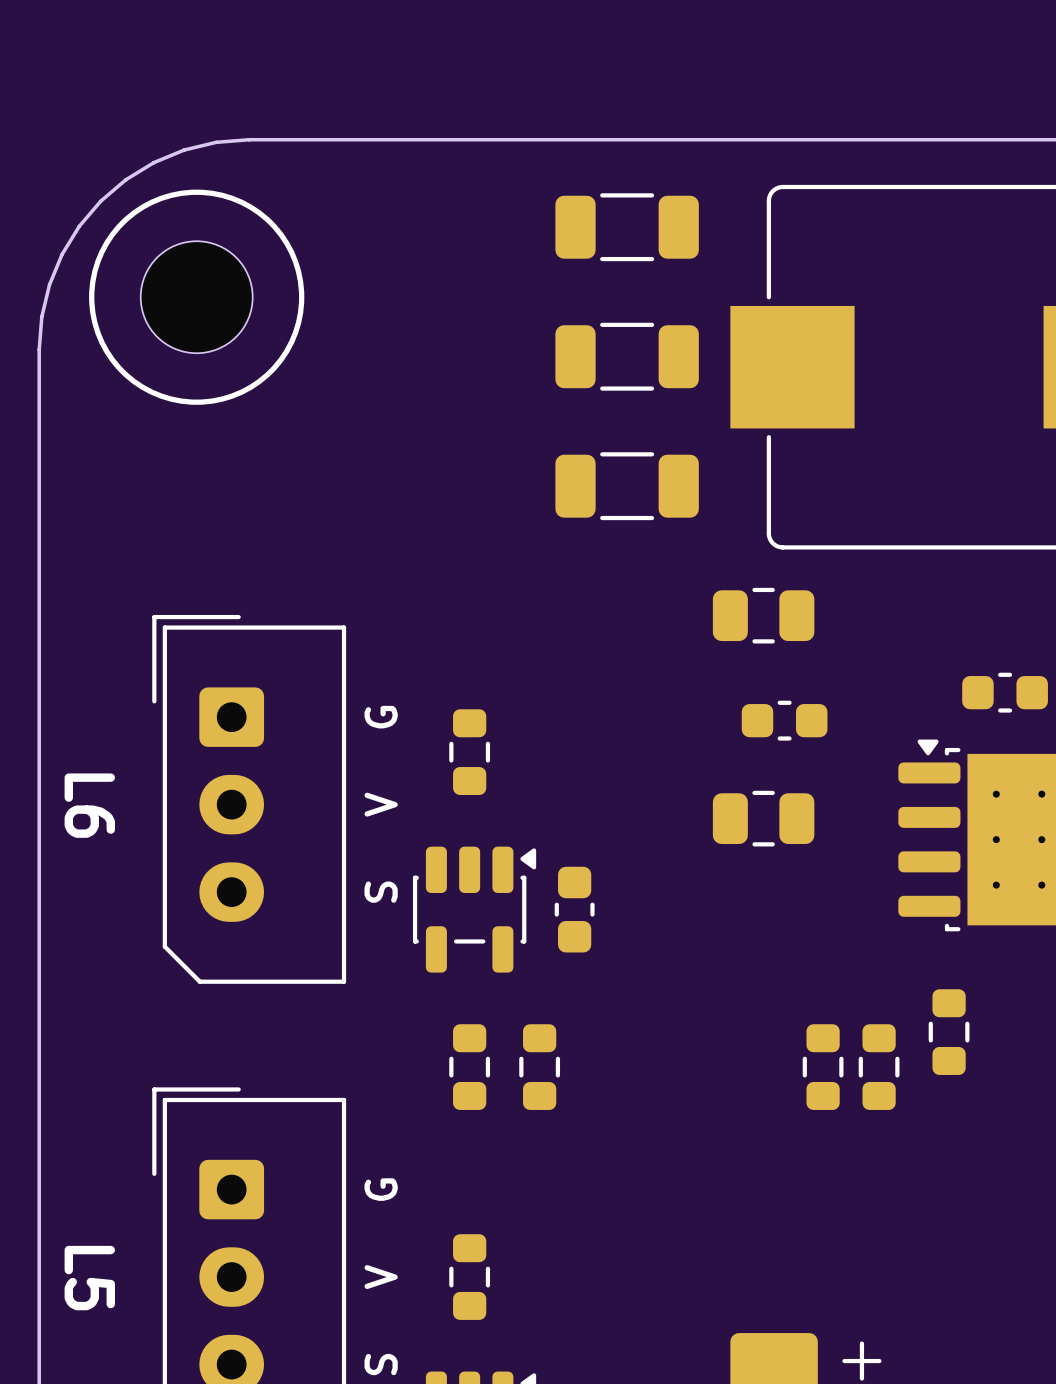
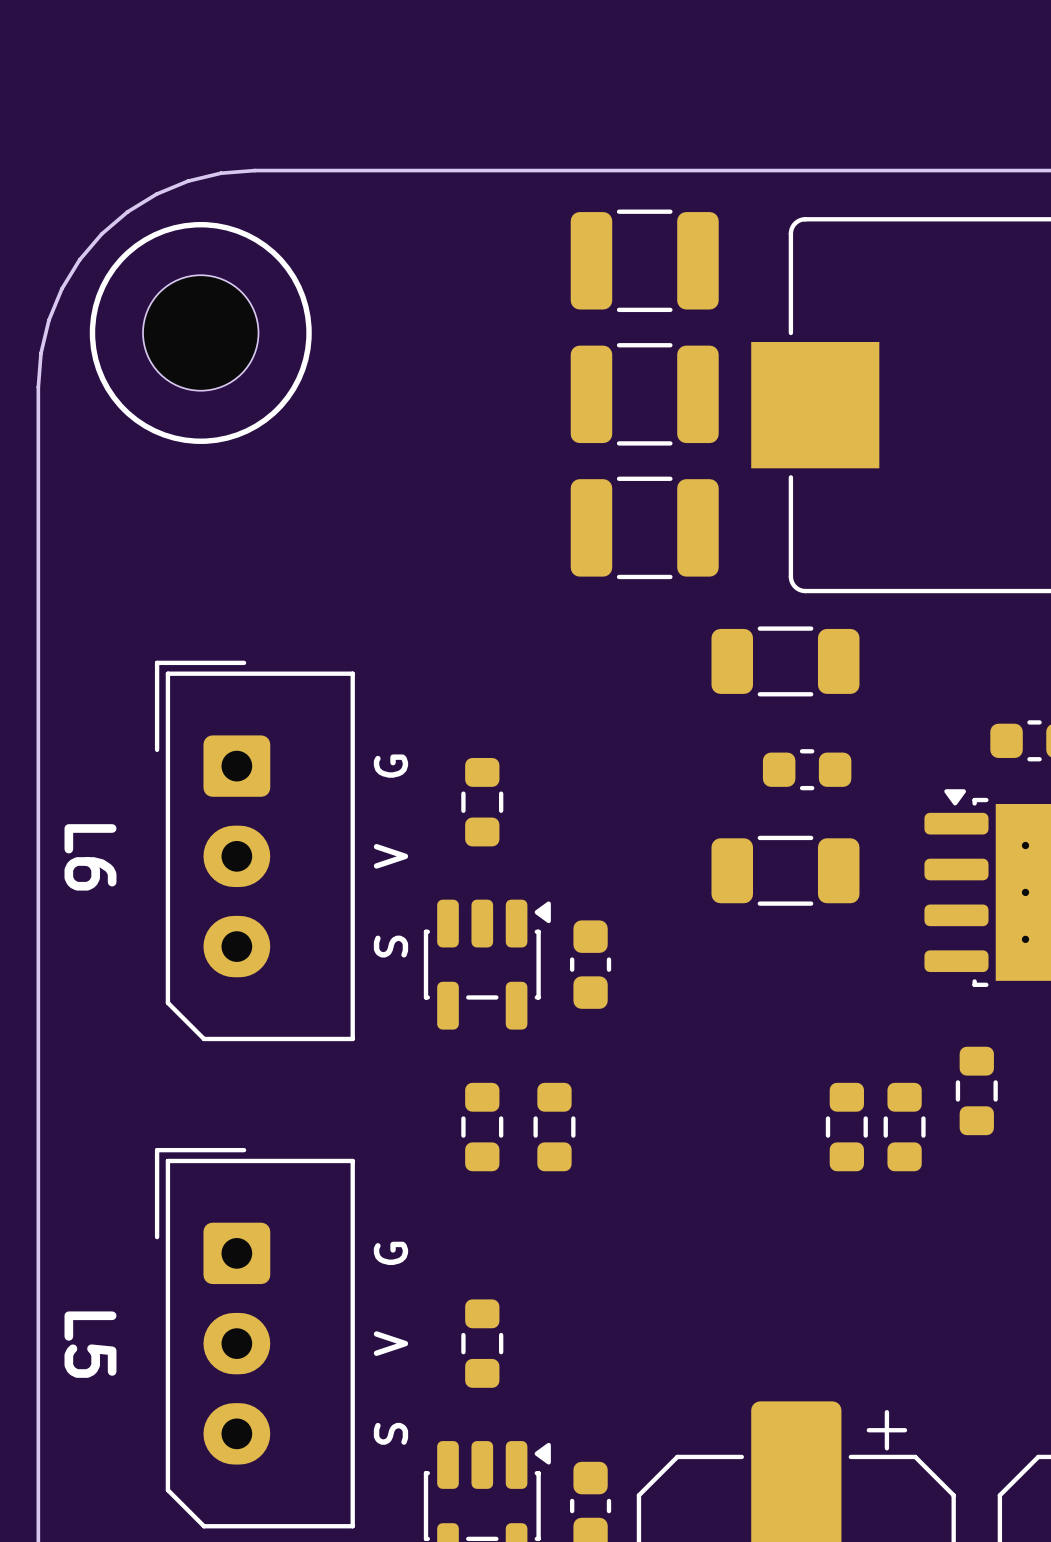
part footprint: [555, 193, 699, 262] -> [570, 209, 719, 313]
part footprint: [555, 322, 699, 391] -> [570, 343, 719, 446]
part footprint: [555, 452, 699, 521] -> [570, 476, 719, 580]
part footprint: [712, 587, 815, 644] -> [711, 626, 860, 697]
part footprint: [712, 790, 815, 847] -> [711, 835, 860, 906]

